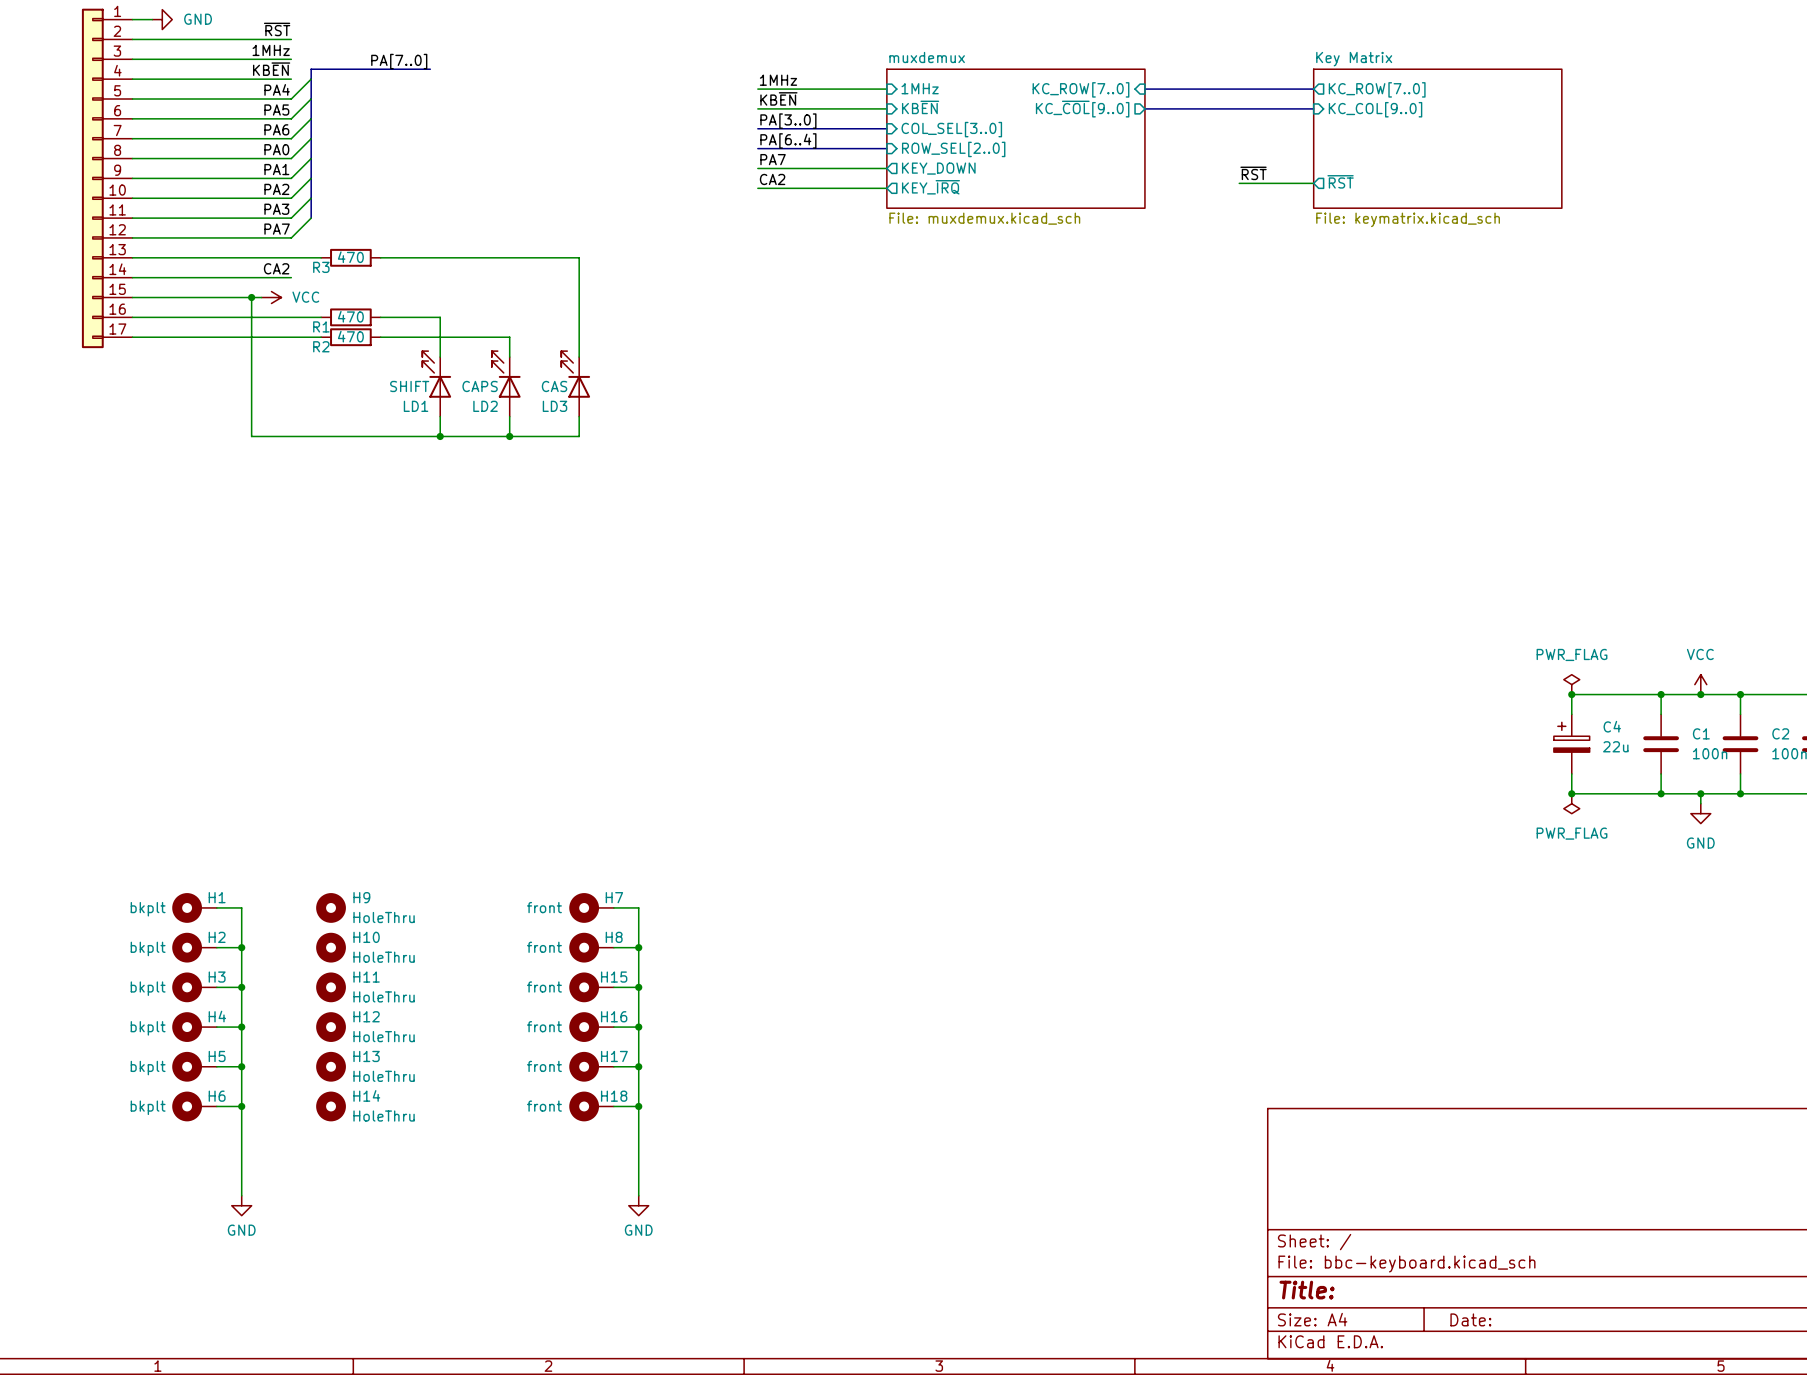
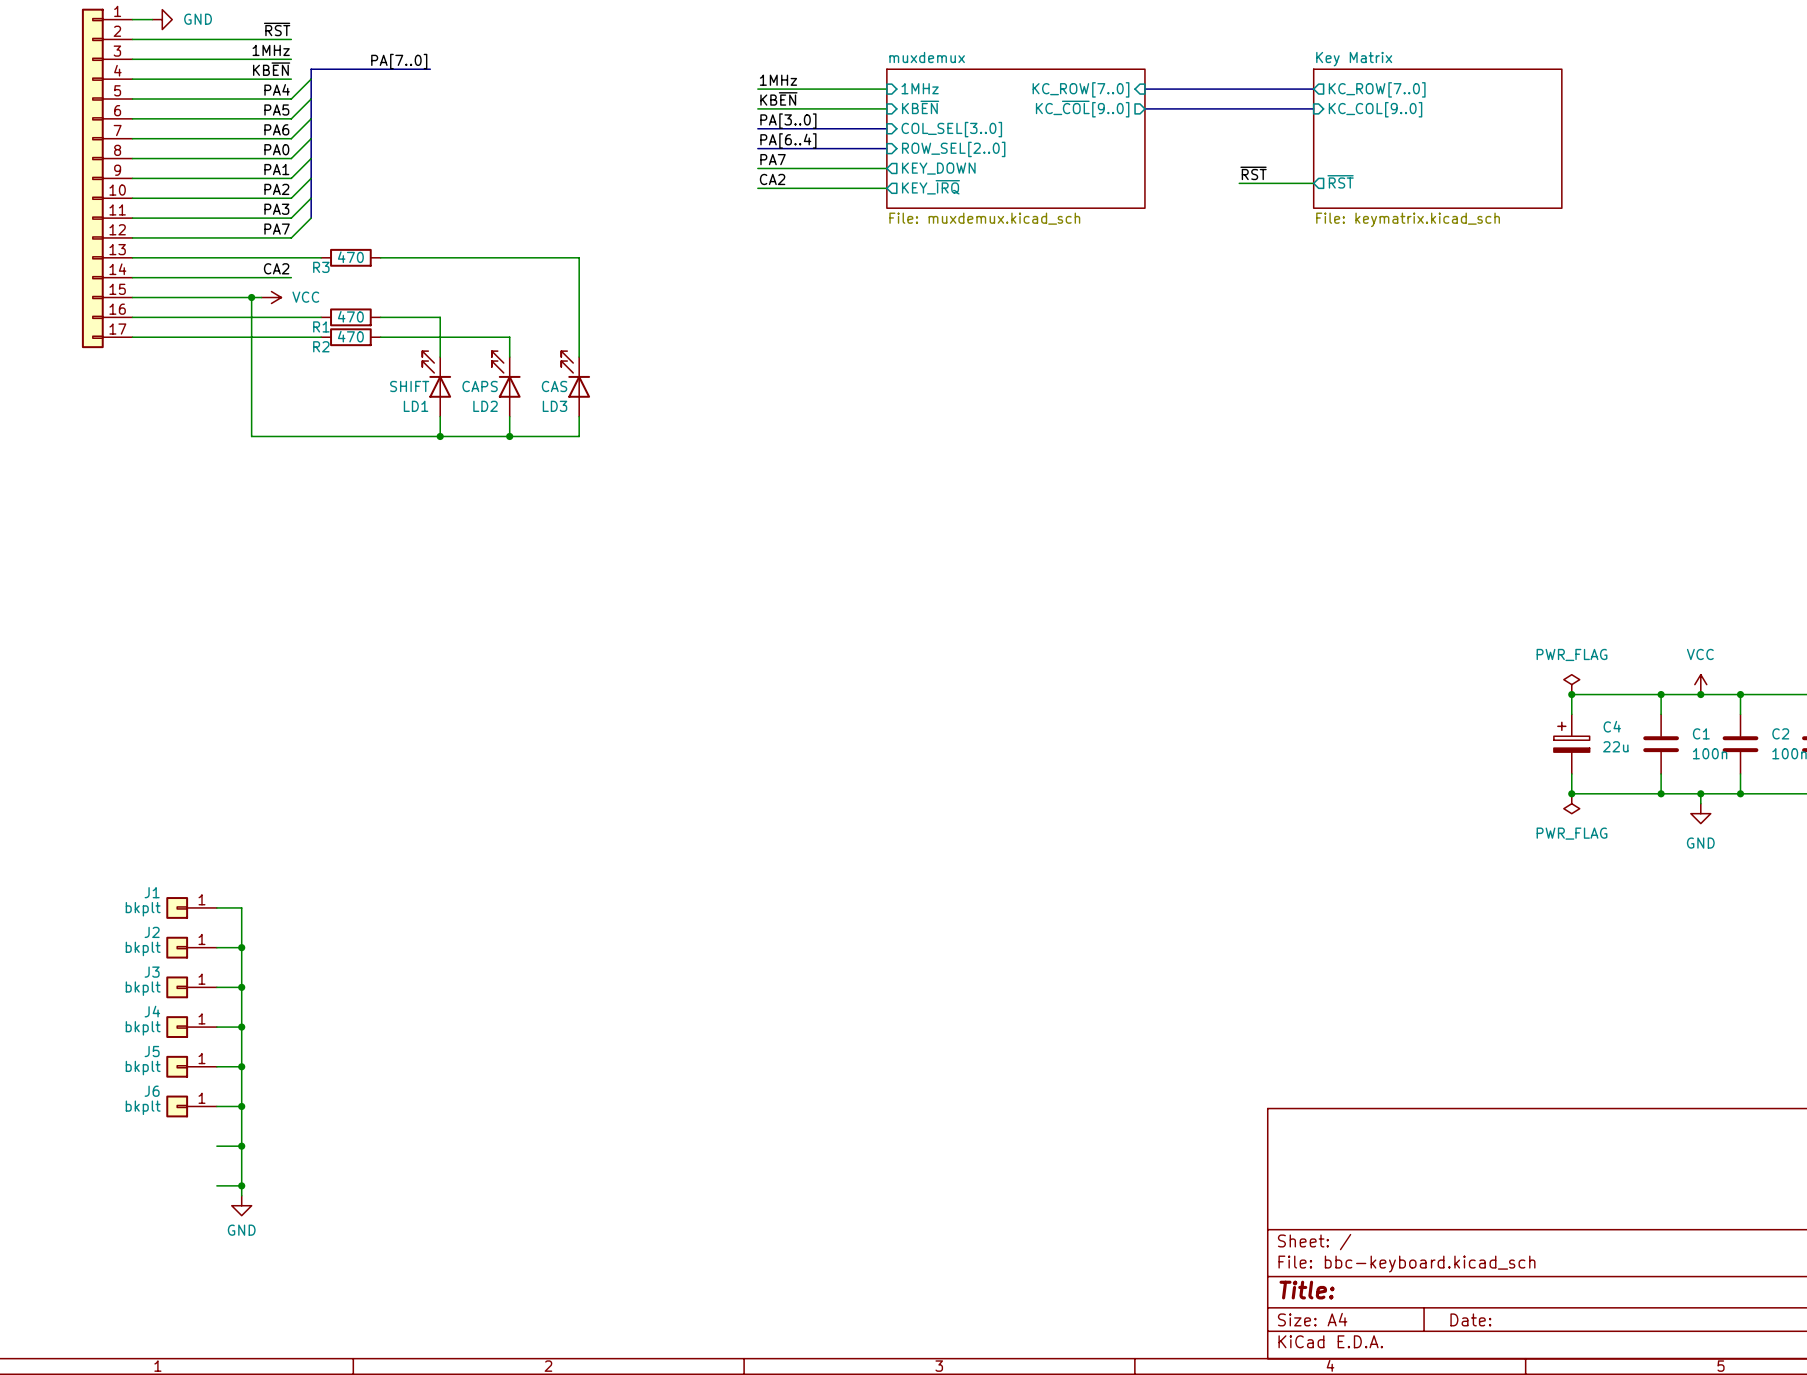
J1: none -> bkplt (191, 907)
H1: bkplt (194, 907) -> none
H9: HoleThru (331, 907) -> none
H7: front (591, 907) -> none
wire: (613, 907) (638, 907) (638, 1195) -> none
J2: none -> bkplt (191, 947)
H2: bkplt (194, 947) -> none
H10: HoleThru (331, 947) -> none
H8: front (591, 947) -> none
wire: (613, 947) (638, 947) -> none
junction: (638, 947) -> none
J3: none -> bkplt (191, 987)
H3: bkplt (194, 987) -> none
H11: HoleThru (331, 987) -> none
H15: front (591, 987) -> none
wire: (613, 987) (638, 987) -> none
junction: (638, 987) -> none
J4: none -> bkplt (191, 1027)
H4: bkplt (194, 1027) -> none
H12: HoleThru (331, 1027) -> none
H16: front (591, 1027) -> none
wire: (613, 1027) (638, 1027) -> none
junction: (638, 1027) -> none
J5: none -> bkplt (191, 1066)
H5: bkplt (194, 1066) -> none
H13: HoleThru (331, 1066) -> none
H17: front (591, 1066) -> none
wire: (613, 1066) (638, 1066) -> none
junction: (638, 1066) -> none
J6: none -> bkplt (191, 1106)
H6: bkplt (194, 1106) -> none
H14: HoleThru (331, 1106) -> none
H18: front (591, 1106) -> none
wire: (613, 1106) (638, 1106) -> none
junction: (638, 1106) -> none
wire: none -> (216, 1146) (241, 1146)
junction: none -> (241, 1146)
wire: none -> (216, 1185) (241, 1185)
junction: none -> (241, 1185)
power symbol: GND (638, 1205) -> none

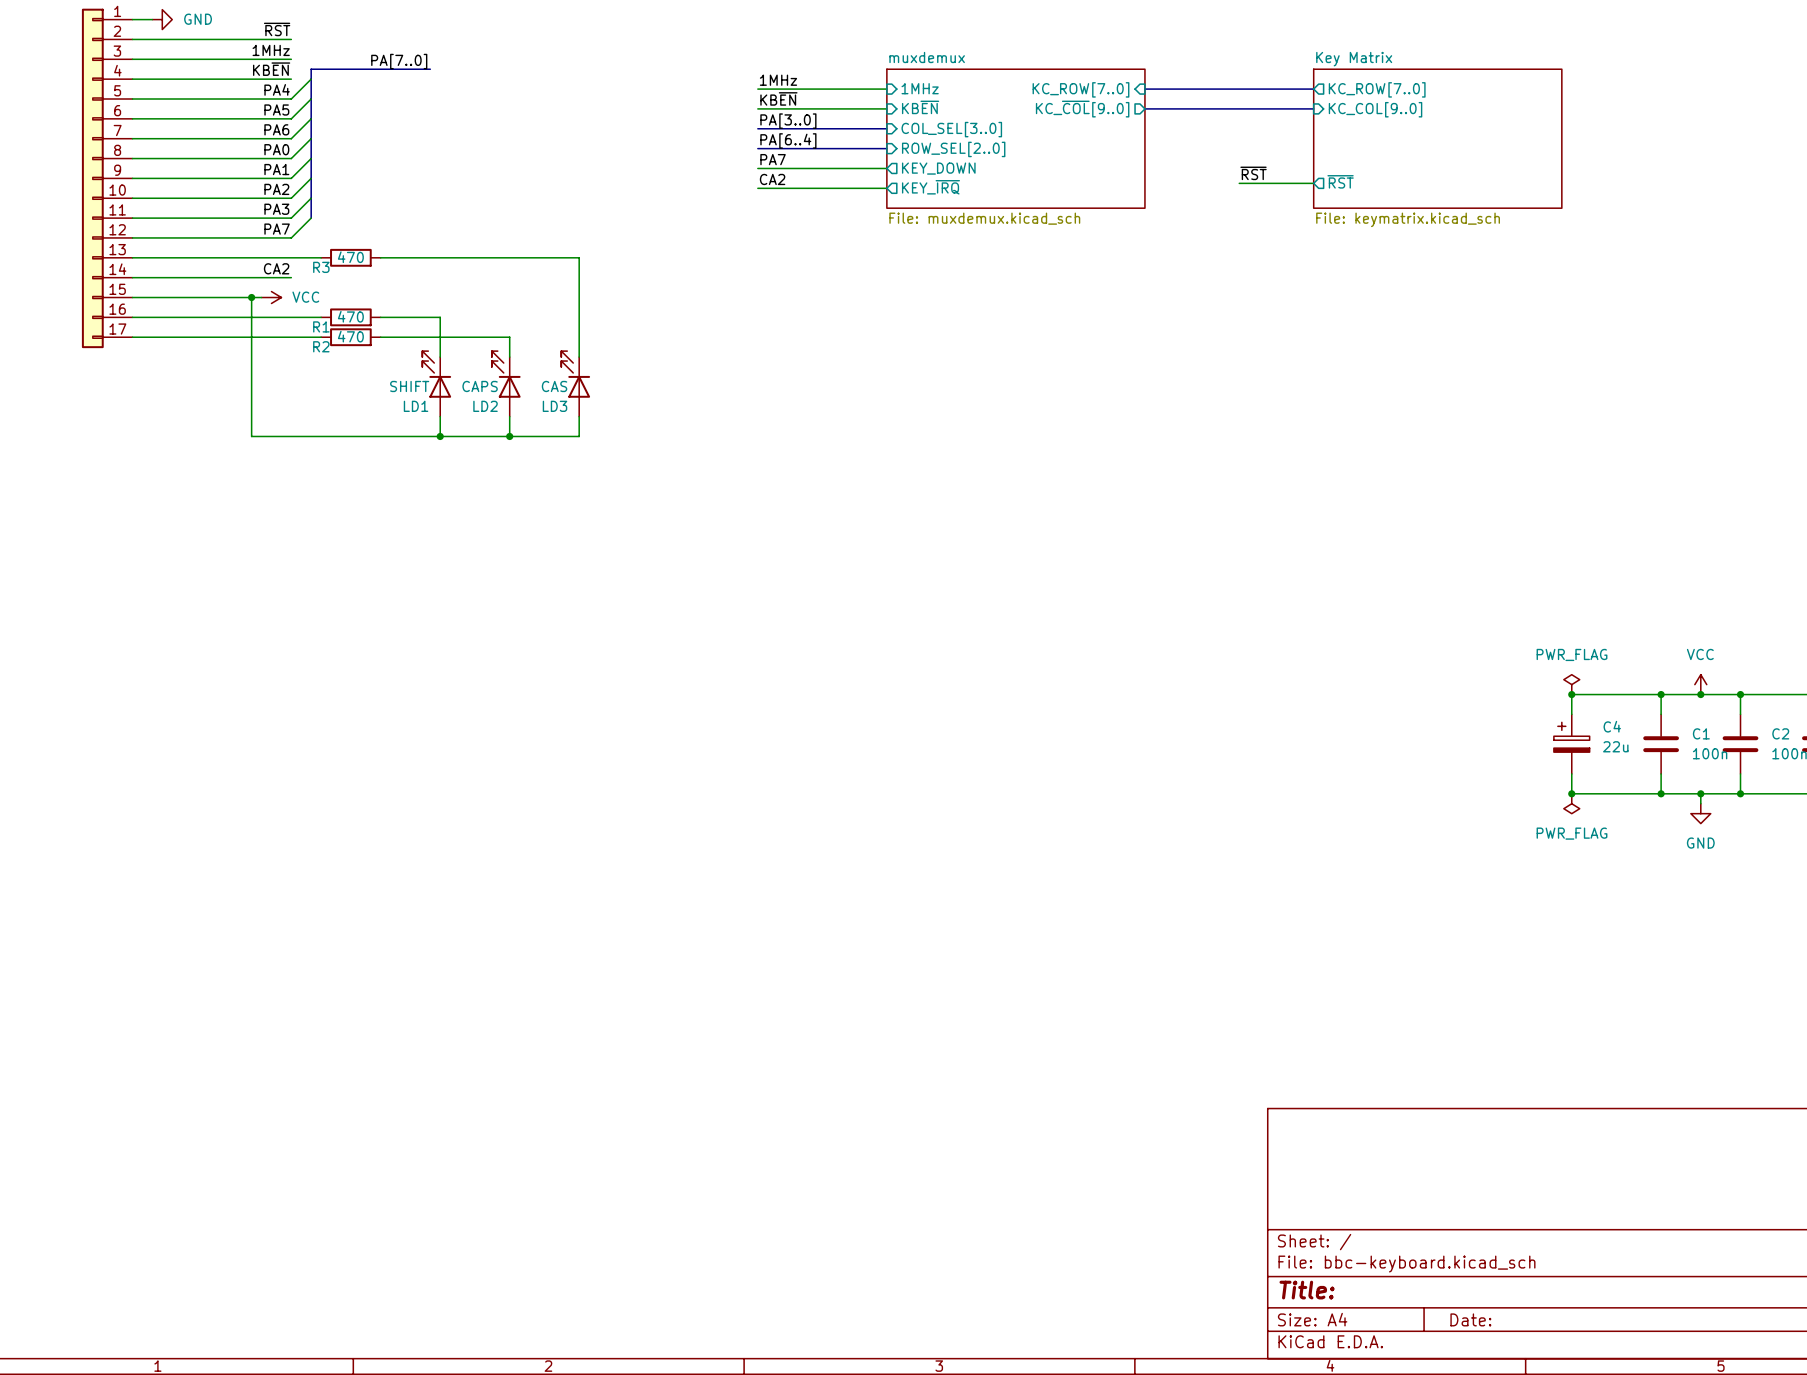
J1: bkplt (191, 907) -> none
wire: (216, 907) (241, 907) (241, 1195) -> none
J2: bkplt (191, 947) -> none
wire: (216, 947) (241, 947) -> none
junction: (241, 947) -> none
J3: bkplt (191, 987) -> none
wire: (216, 987) (241, 987) -> none
junction: (241, 987) -> none
J4: bkplt (191, 1027) -> none
wire: (216, 1027) (241, 1027) -> none
junction: (241, 1027) -> none
J5: bkplt (191, 1066) -> none
wire: (216, 1066) (241, 1066) -> none
junction: (241, 1066) -> none
J6: bkplt (191, 1106) -> none
wire: (216, 1106) (241, 1106) -> none
junction: (241, 1106) -> none
wire: (216, 1146) (241, 1146) -> none
junction: (241, 1146) -> none
wire: (216, 1185) (241, 1185) -> none
junction: (241, 1185) -> none
power symbol: GND (241, 1205) -> none

